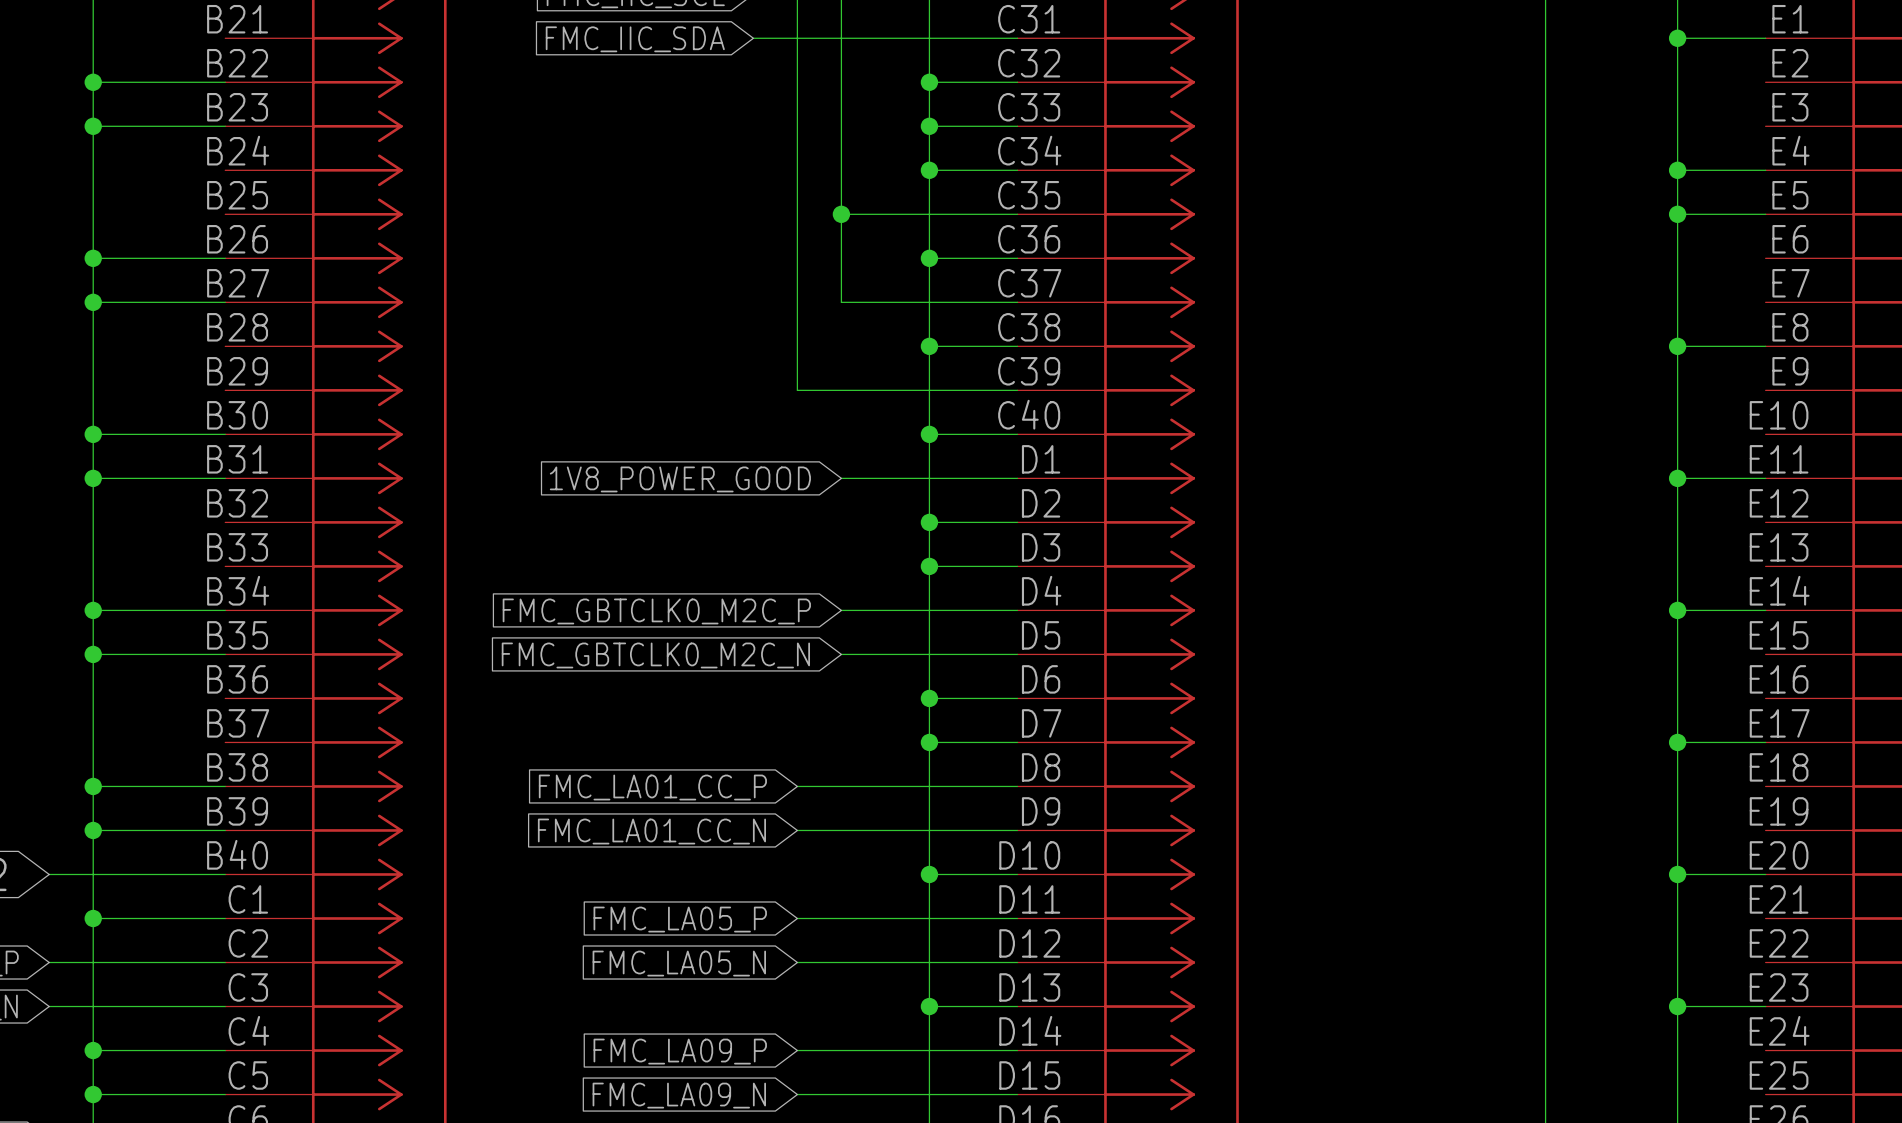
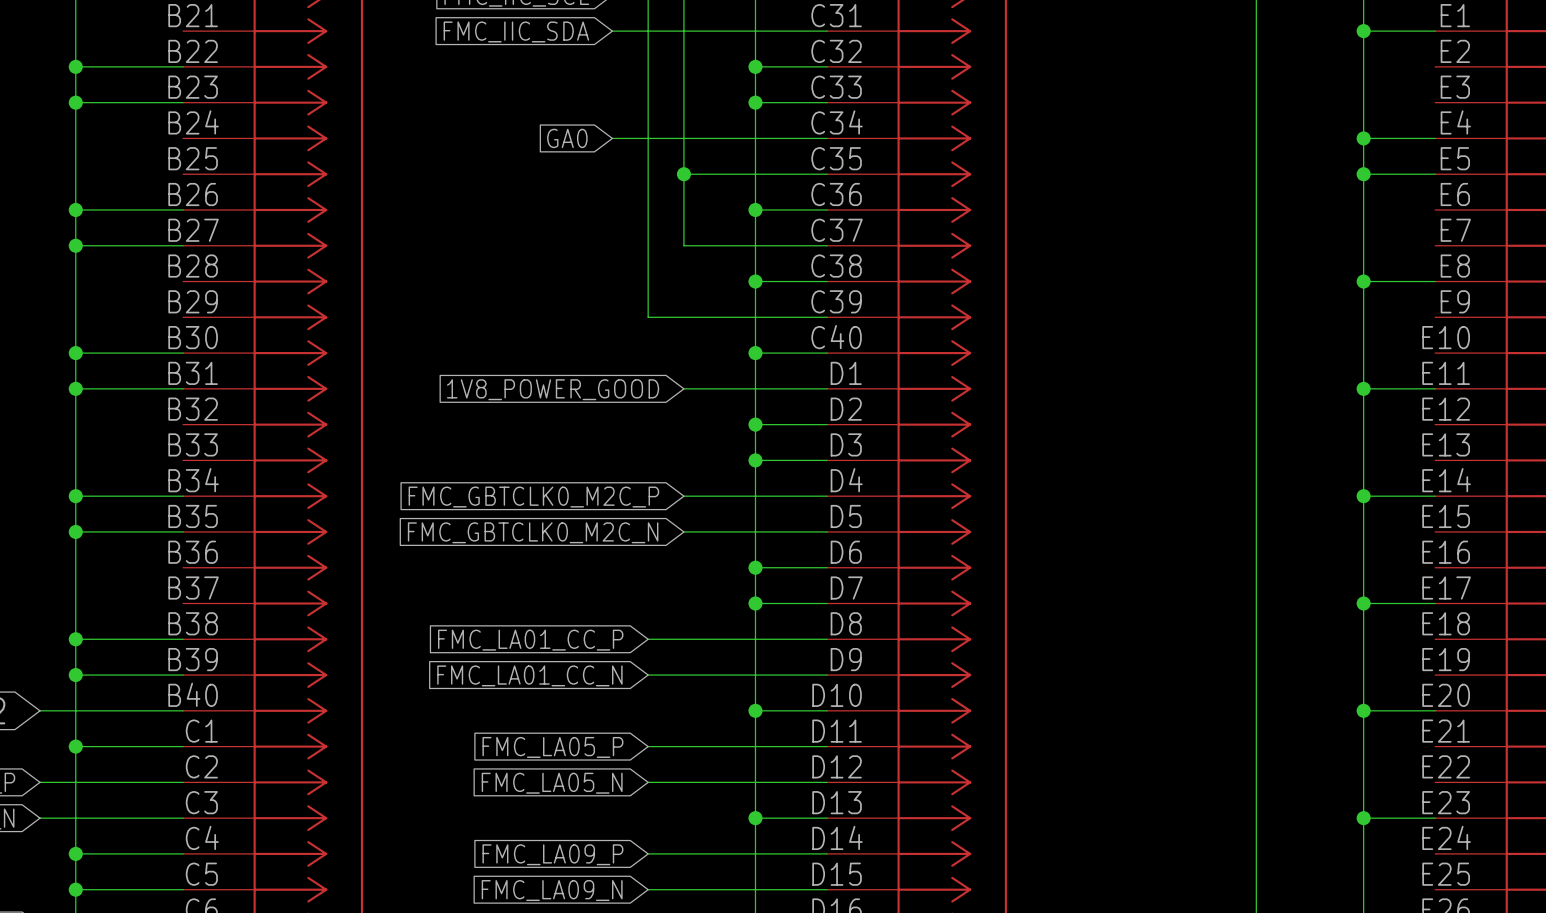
global label: none -> GA0 (567, 138)
wire: none -> (612, 138) (755, 138)
junction: (929, 170) -> none

